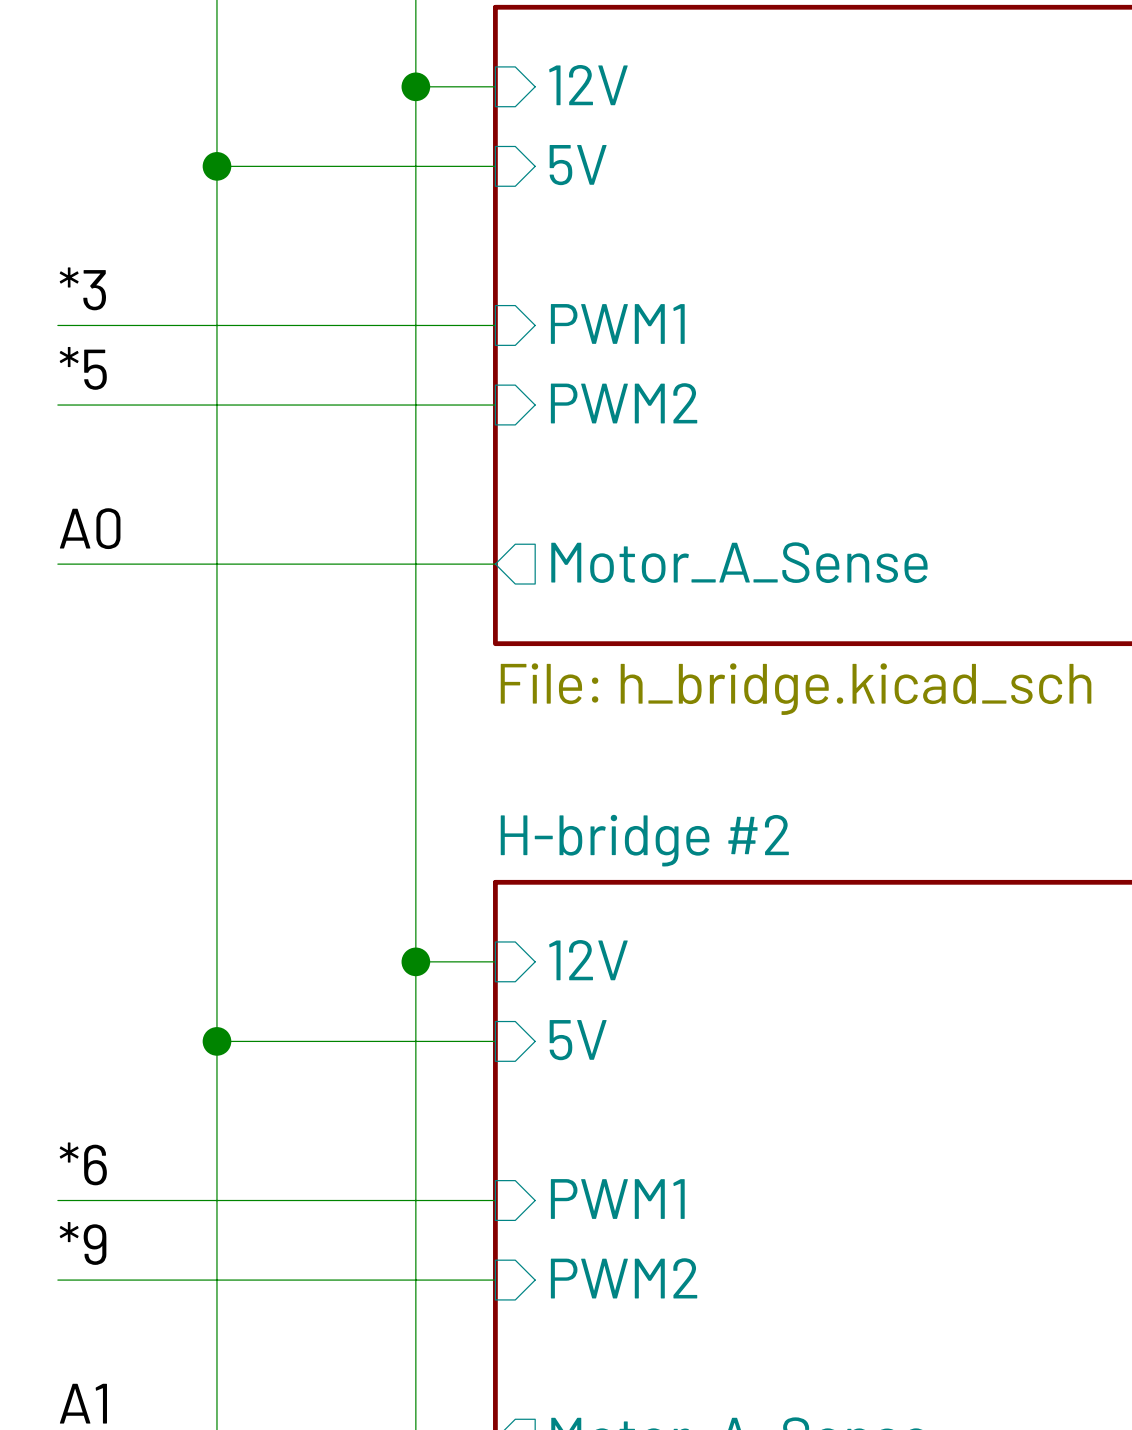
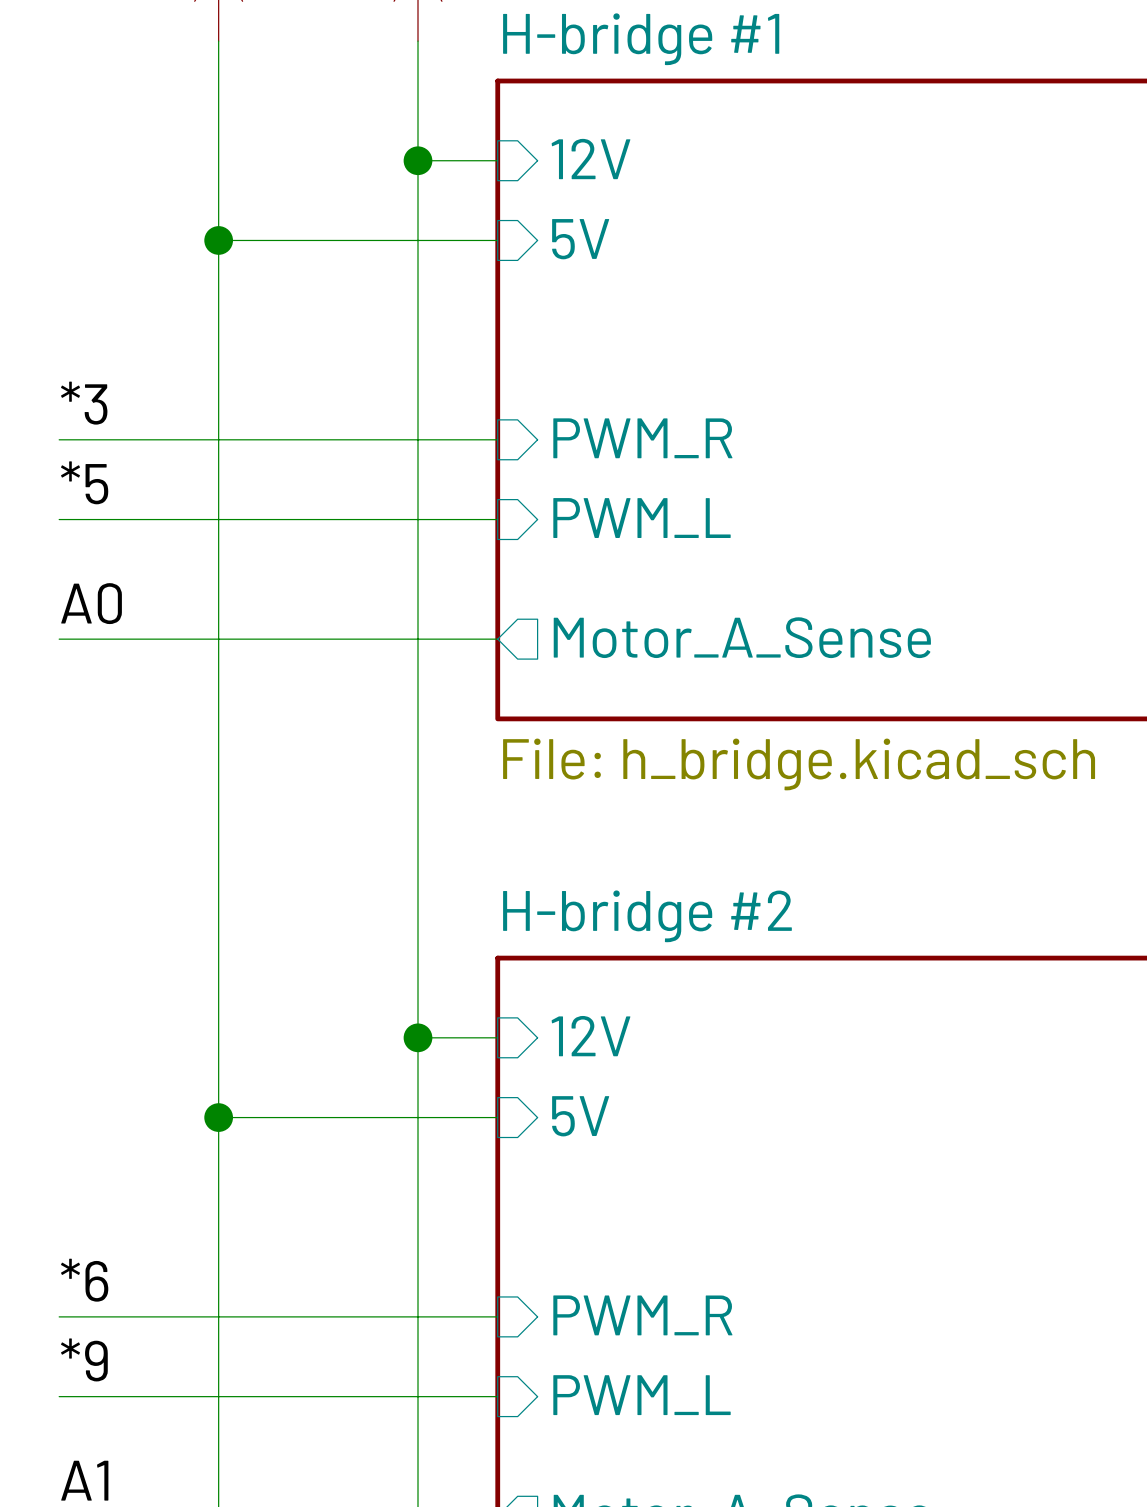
label position: *3 (82, 288) -> *3 (84, 403)
sheet pin: PWM1 (617, 323) -> none
wire: (57, 325) (495, 325) -> (59, 439) (497, 439)
sheet pin: none -> PWM_R (642, 438)
label position: *5 (83, 368) -> *5 (84, 482)
sheet pin: PWM2 (624, 403) -> none
wire: (57, 405) (495, 405) -> (59, 519) (497, 519)
sheet pin: none -> PWM_L (642, 518)
label position: *6 (83, 1163) -> *6 (84, 1280)
sheet pin: PWM1 (617, 1199) -> none
wire: (57, 1200) (495, 1200) -> (59, 1316) (497, 1316)
sheet pin: none -> PWM_R (642, 1315)
label position: *9 (83, 1243) -> *9 (84, 1359)
sheet pin: PWM2 (624, 1278) -> none
wire: (57, 1280) (495, 1280) -> (59, 1396) (497, 1396)
sheet pin: none -> PWM_L (642, 1395)

